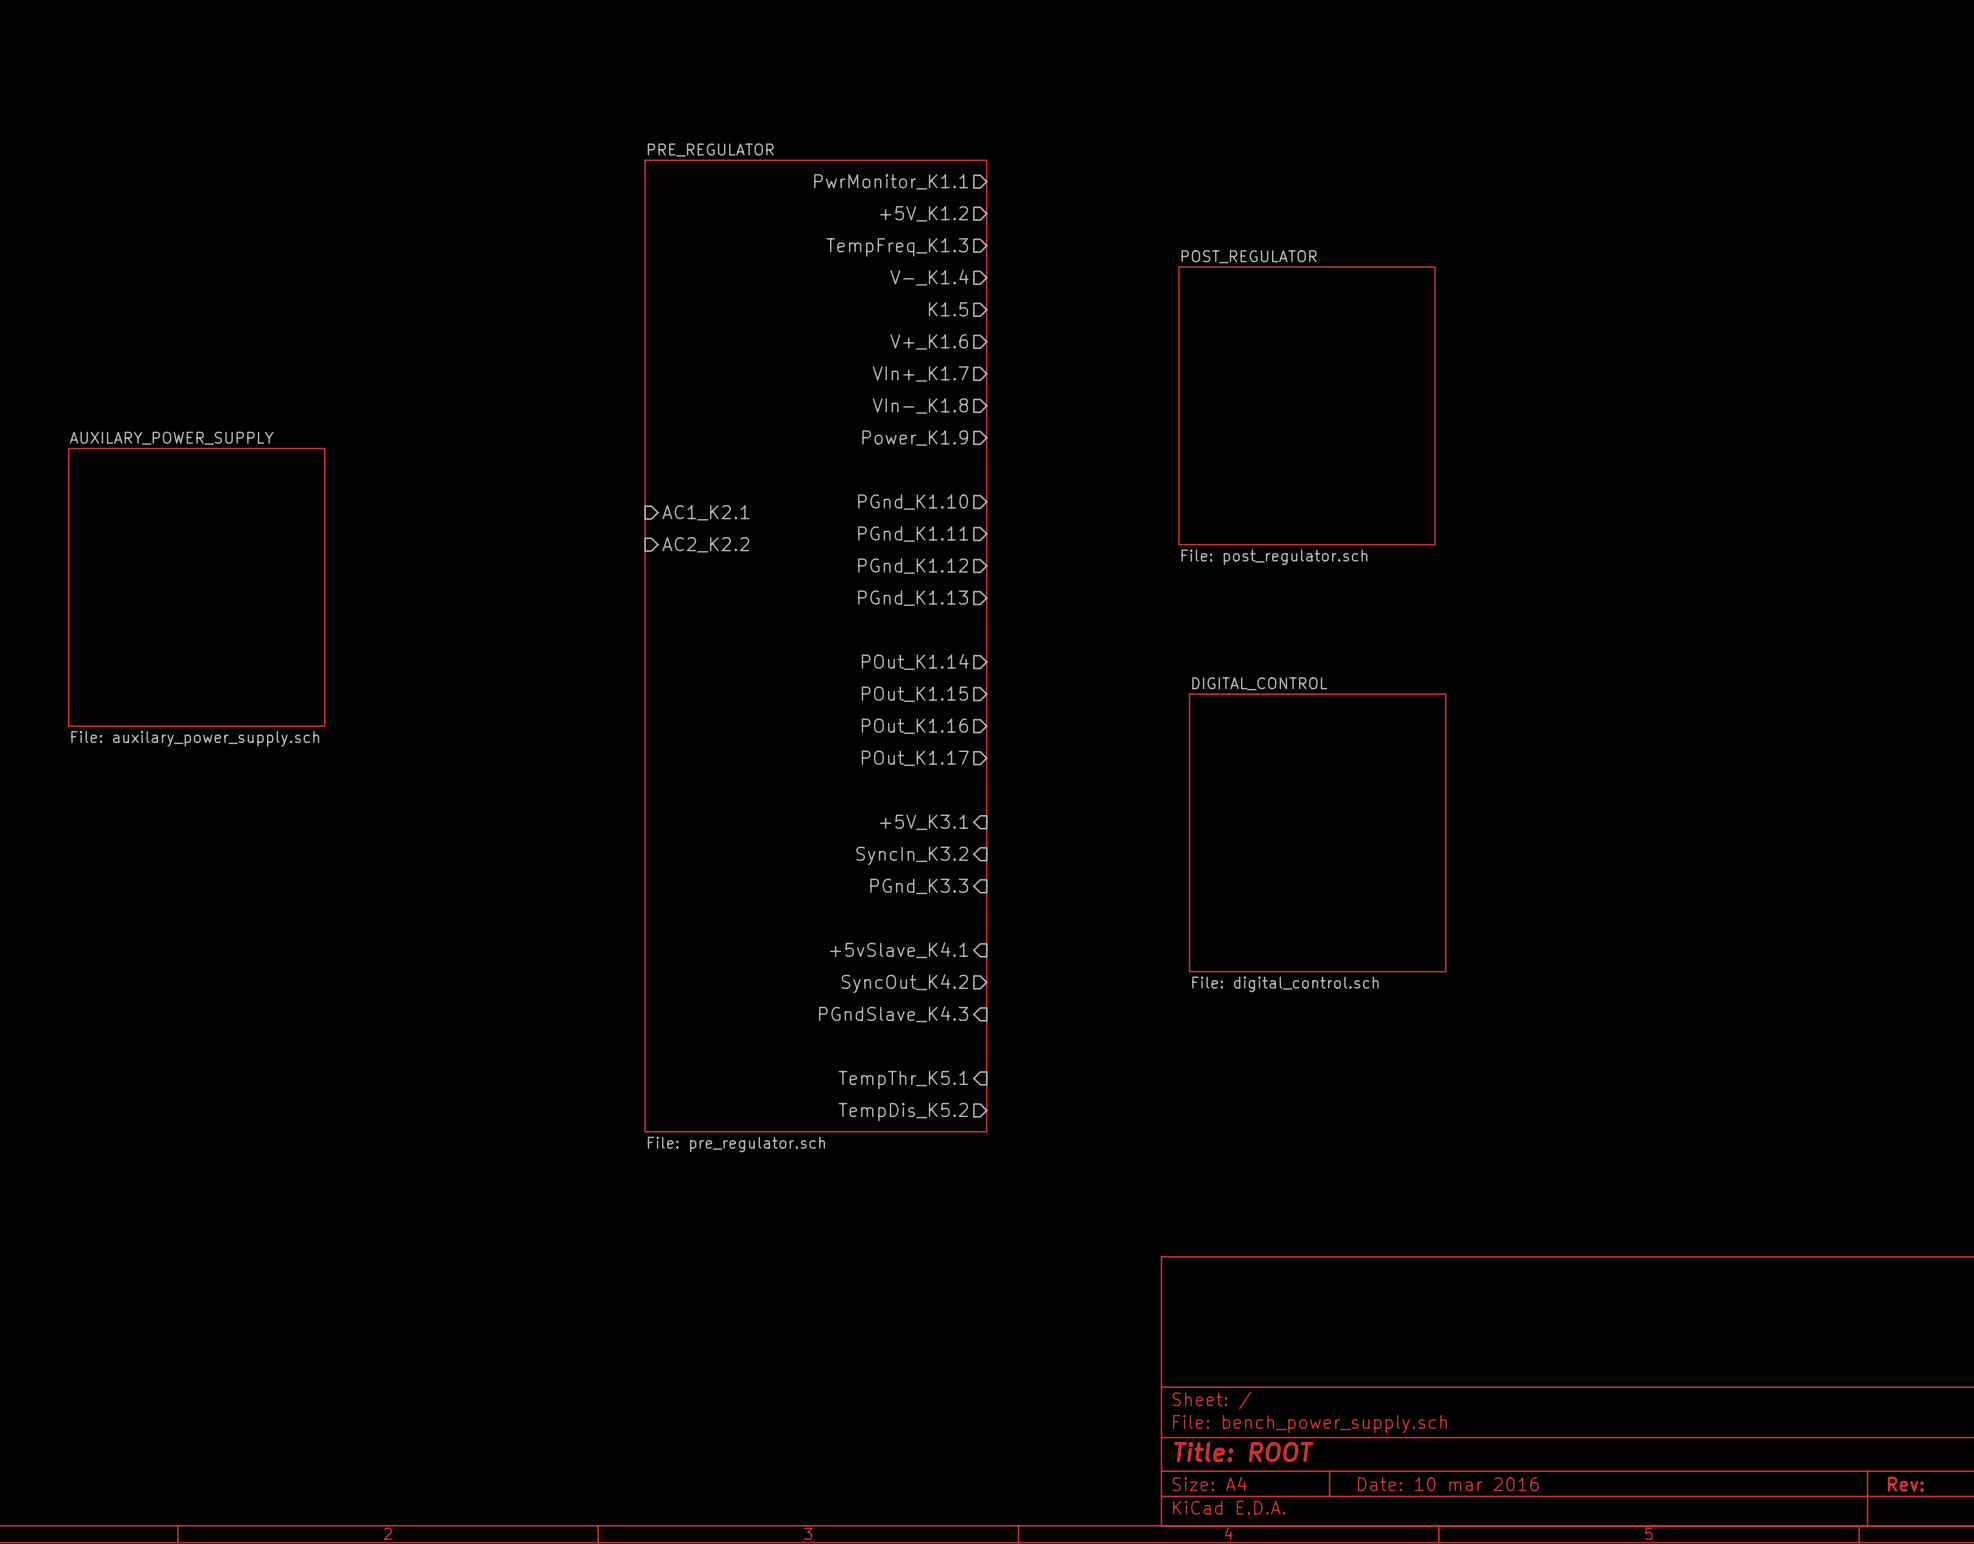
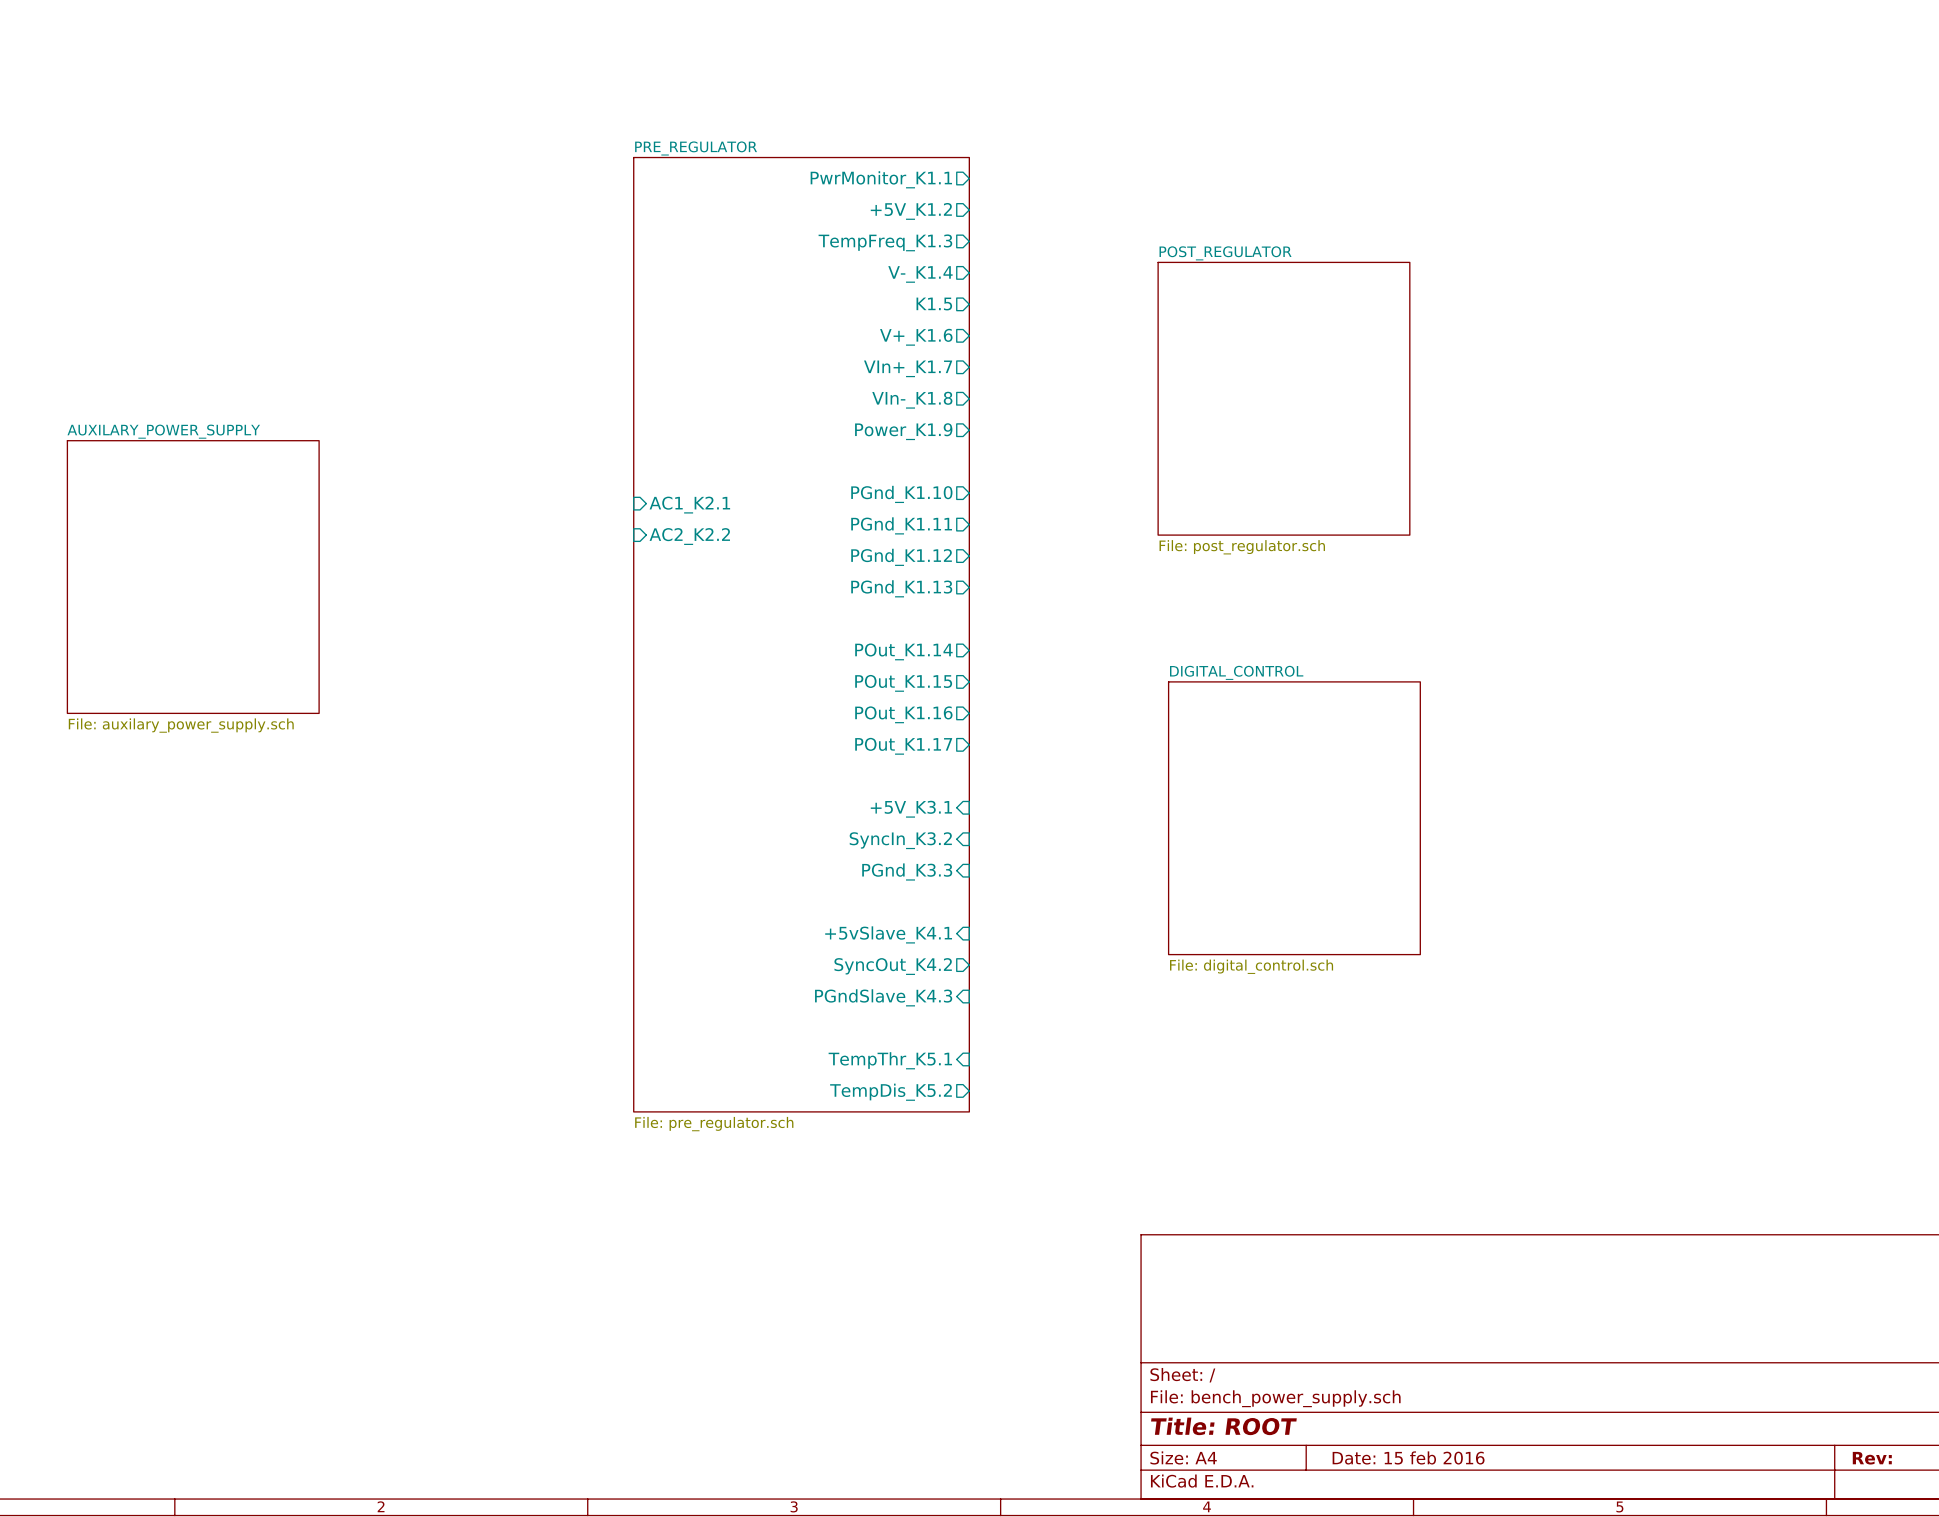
title block: Date: 10 mar 2016 (1448, 1484) -> Date: 15 feb 2016 (1408, 1457)

